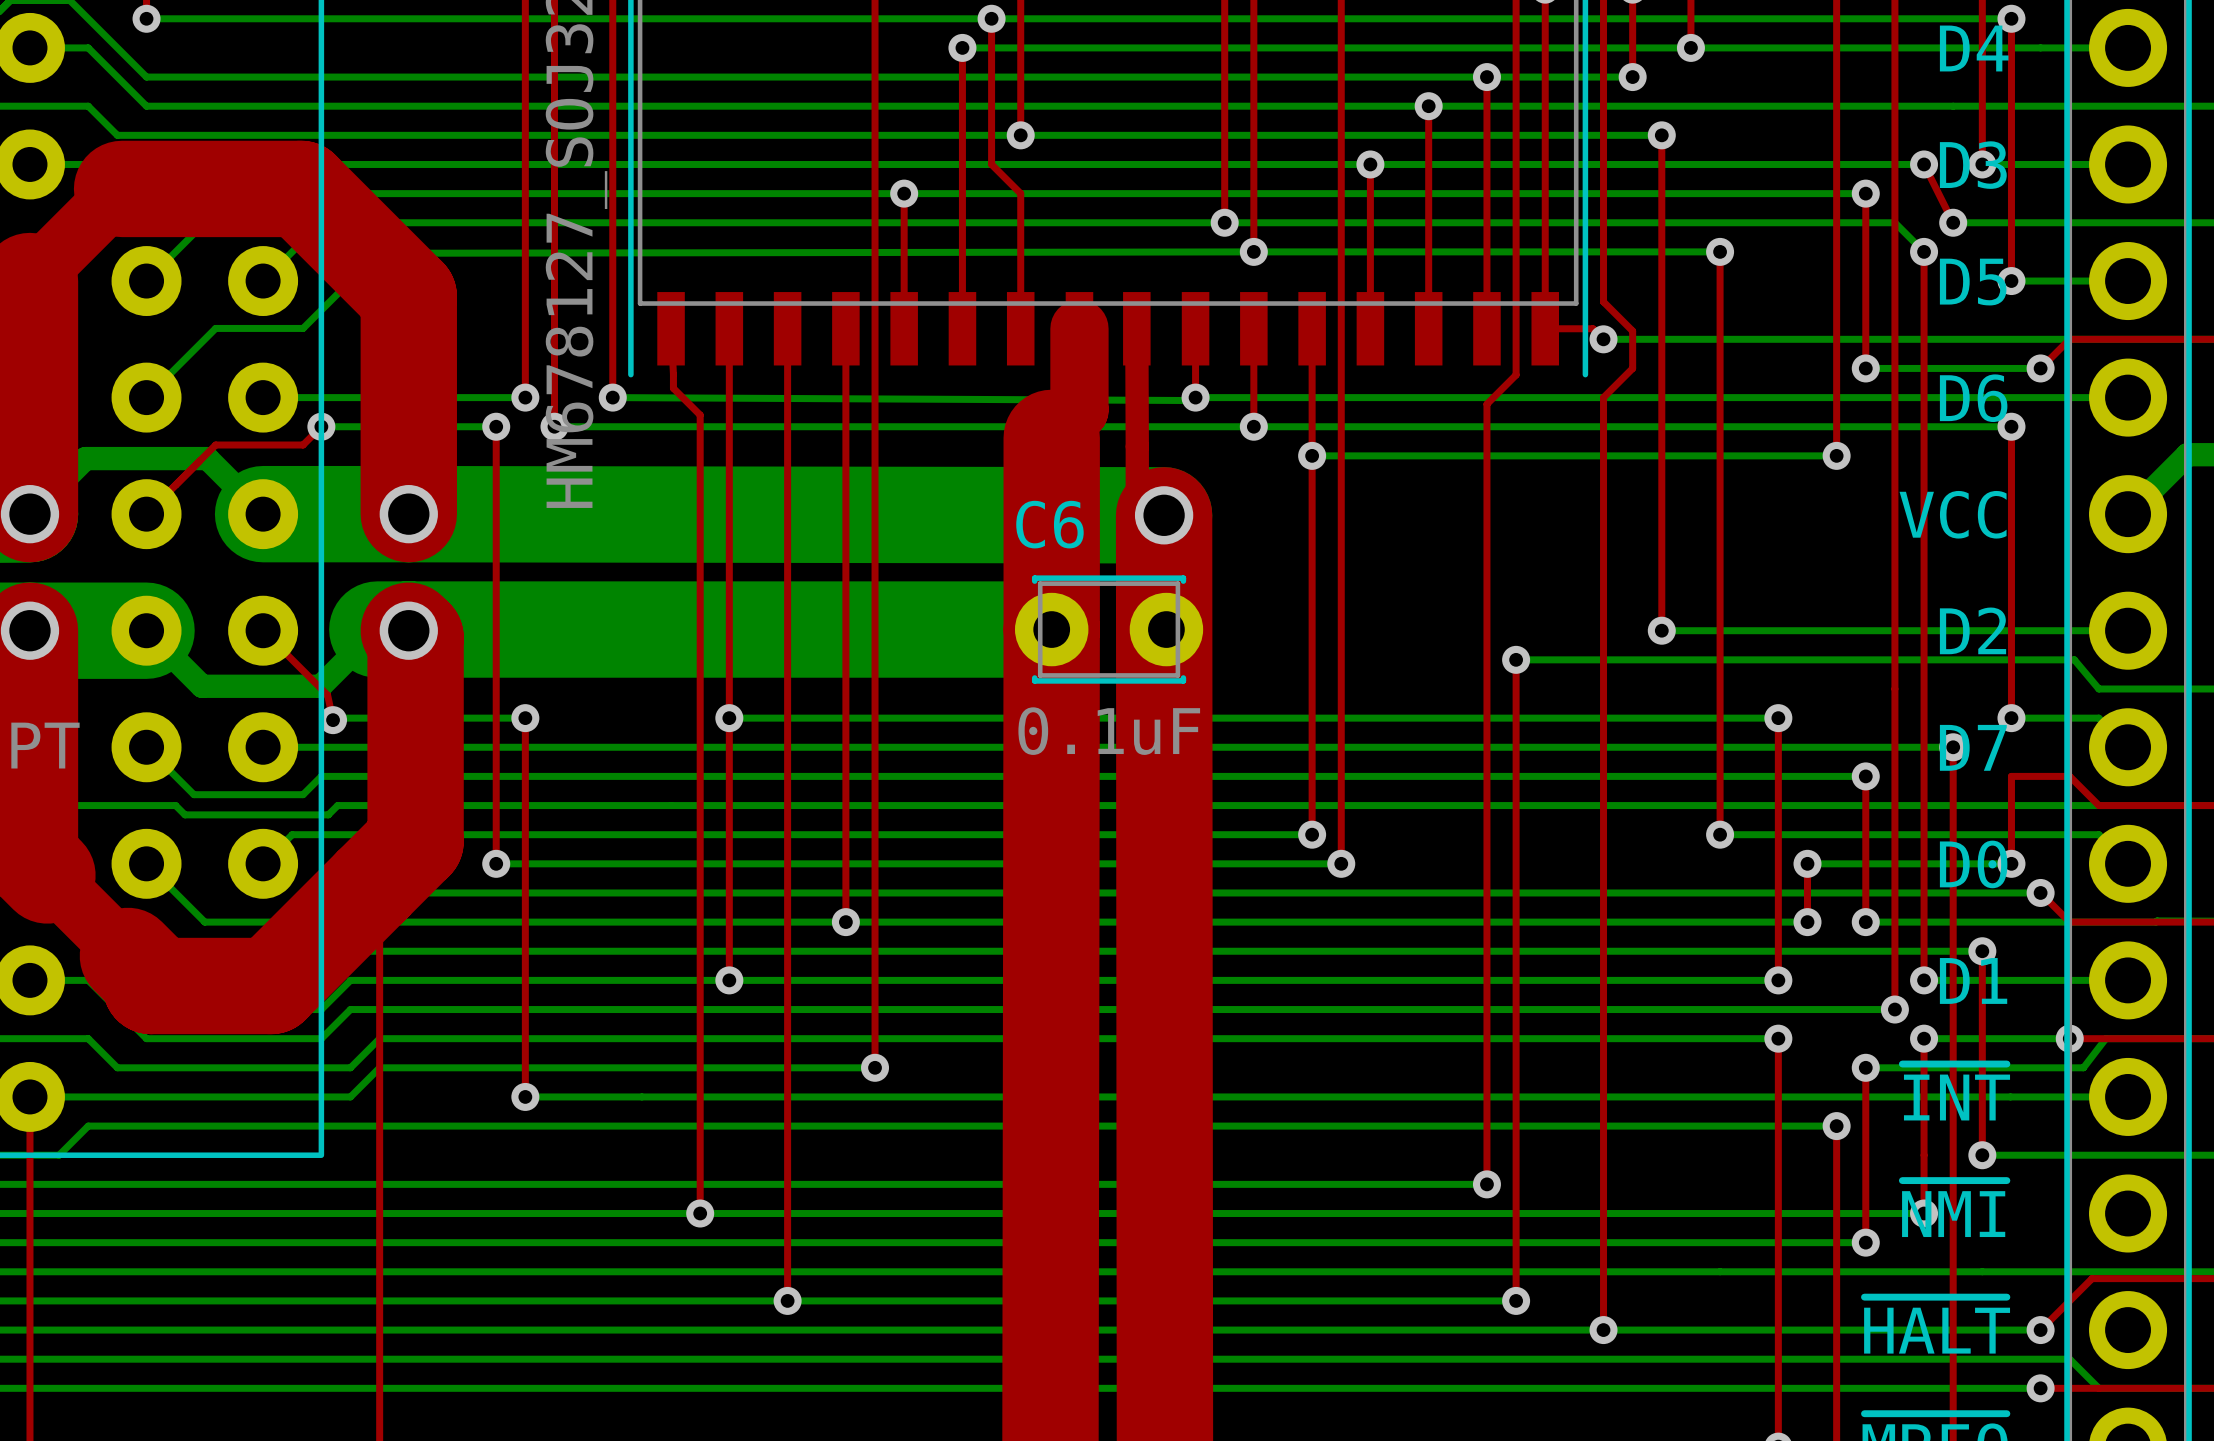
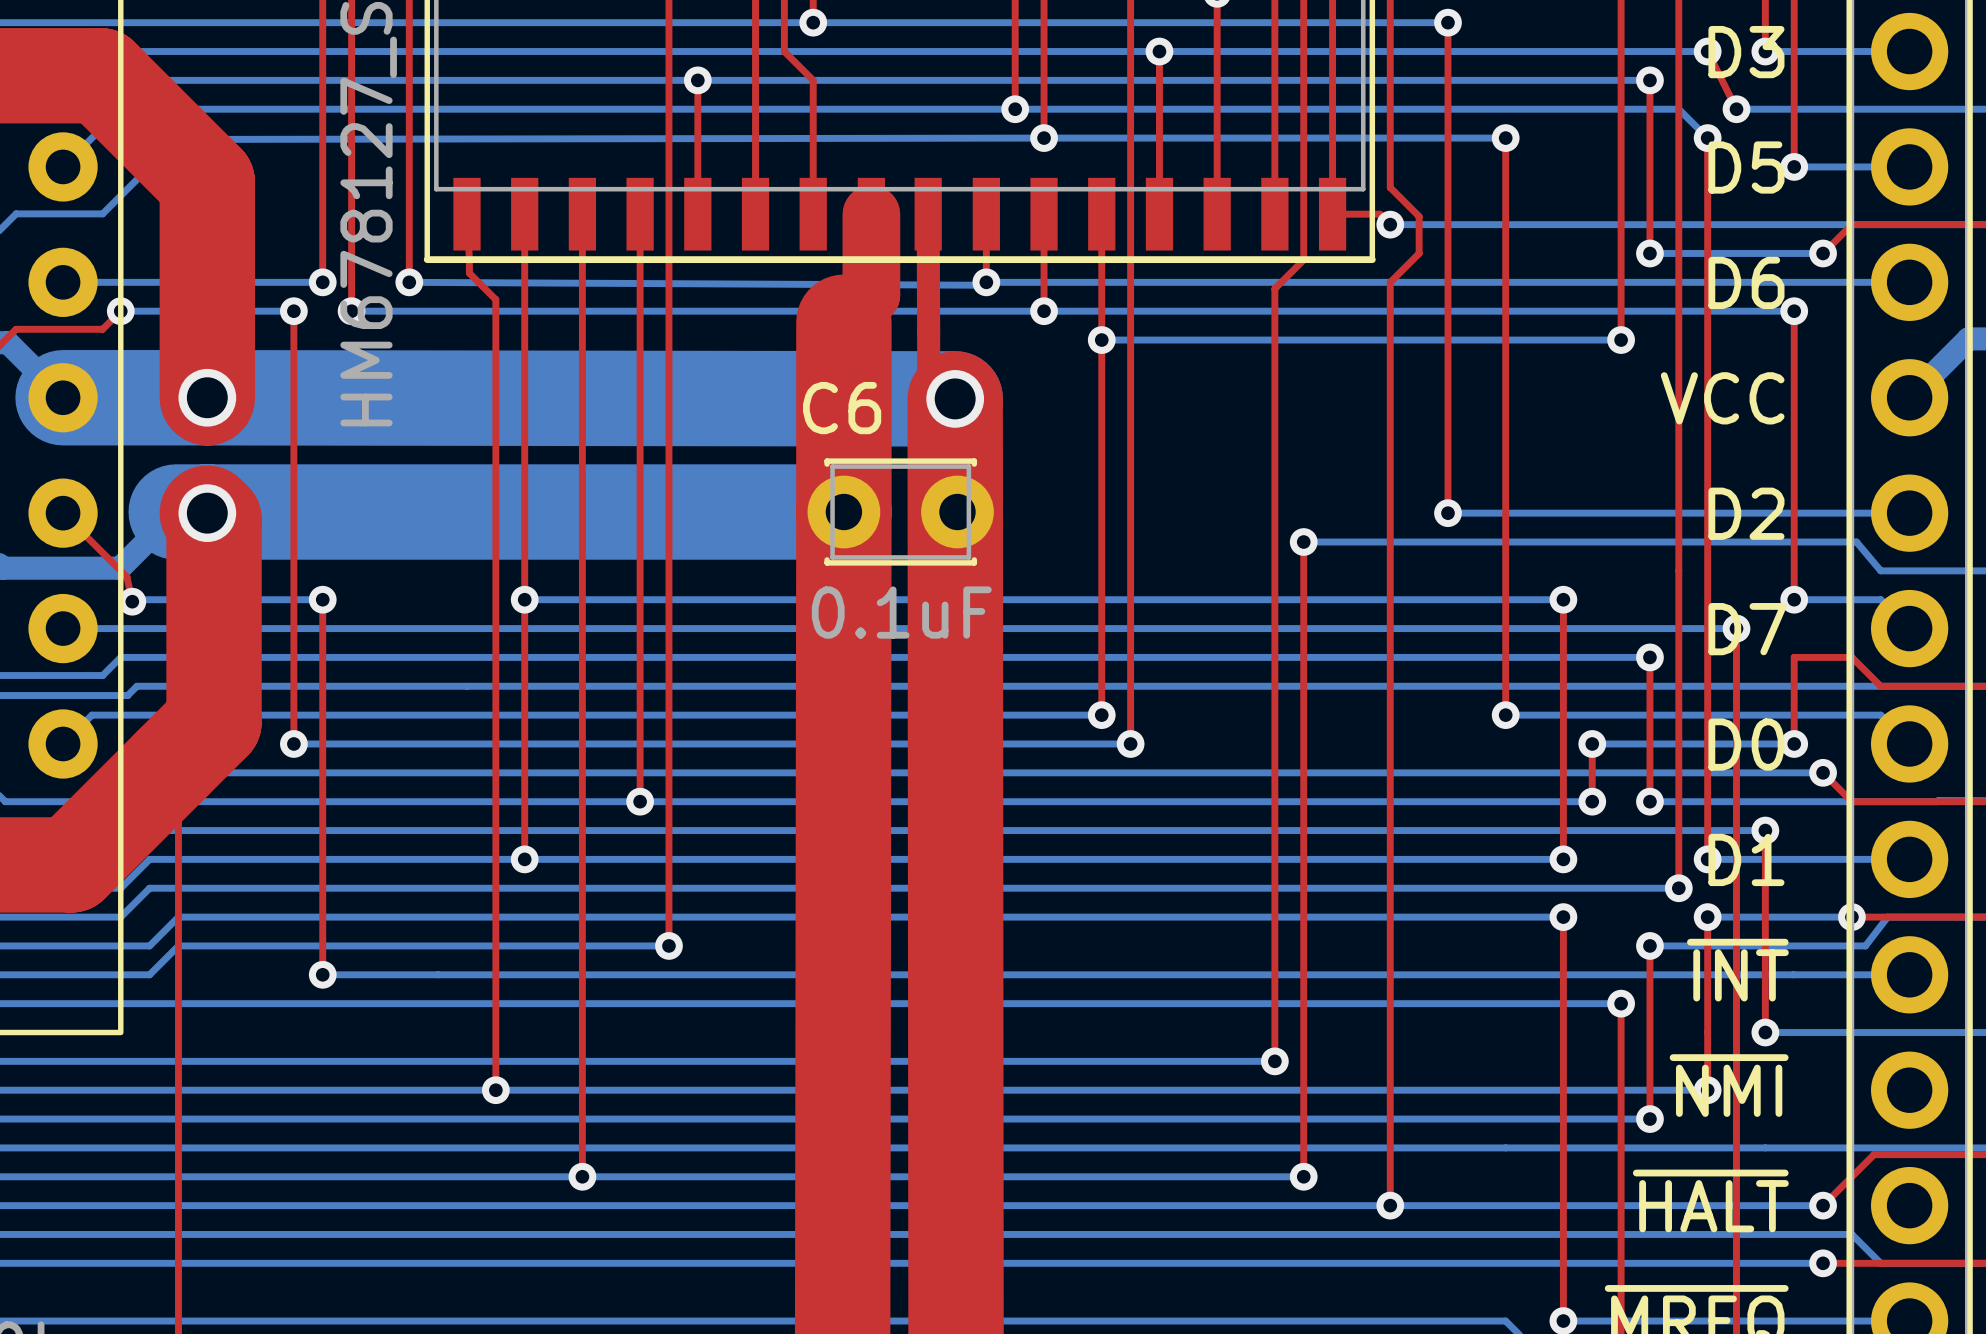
line: none -> (427, 259) (1372, 259)

